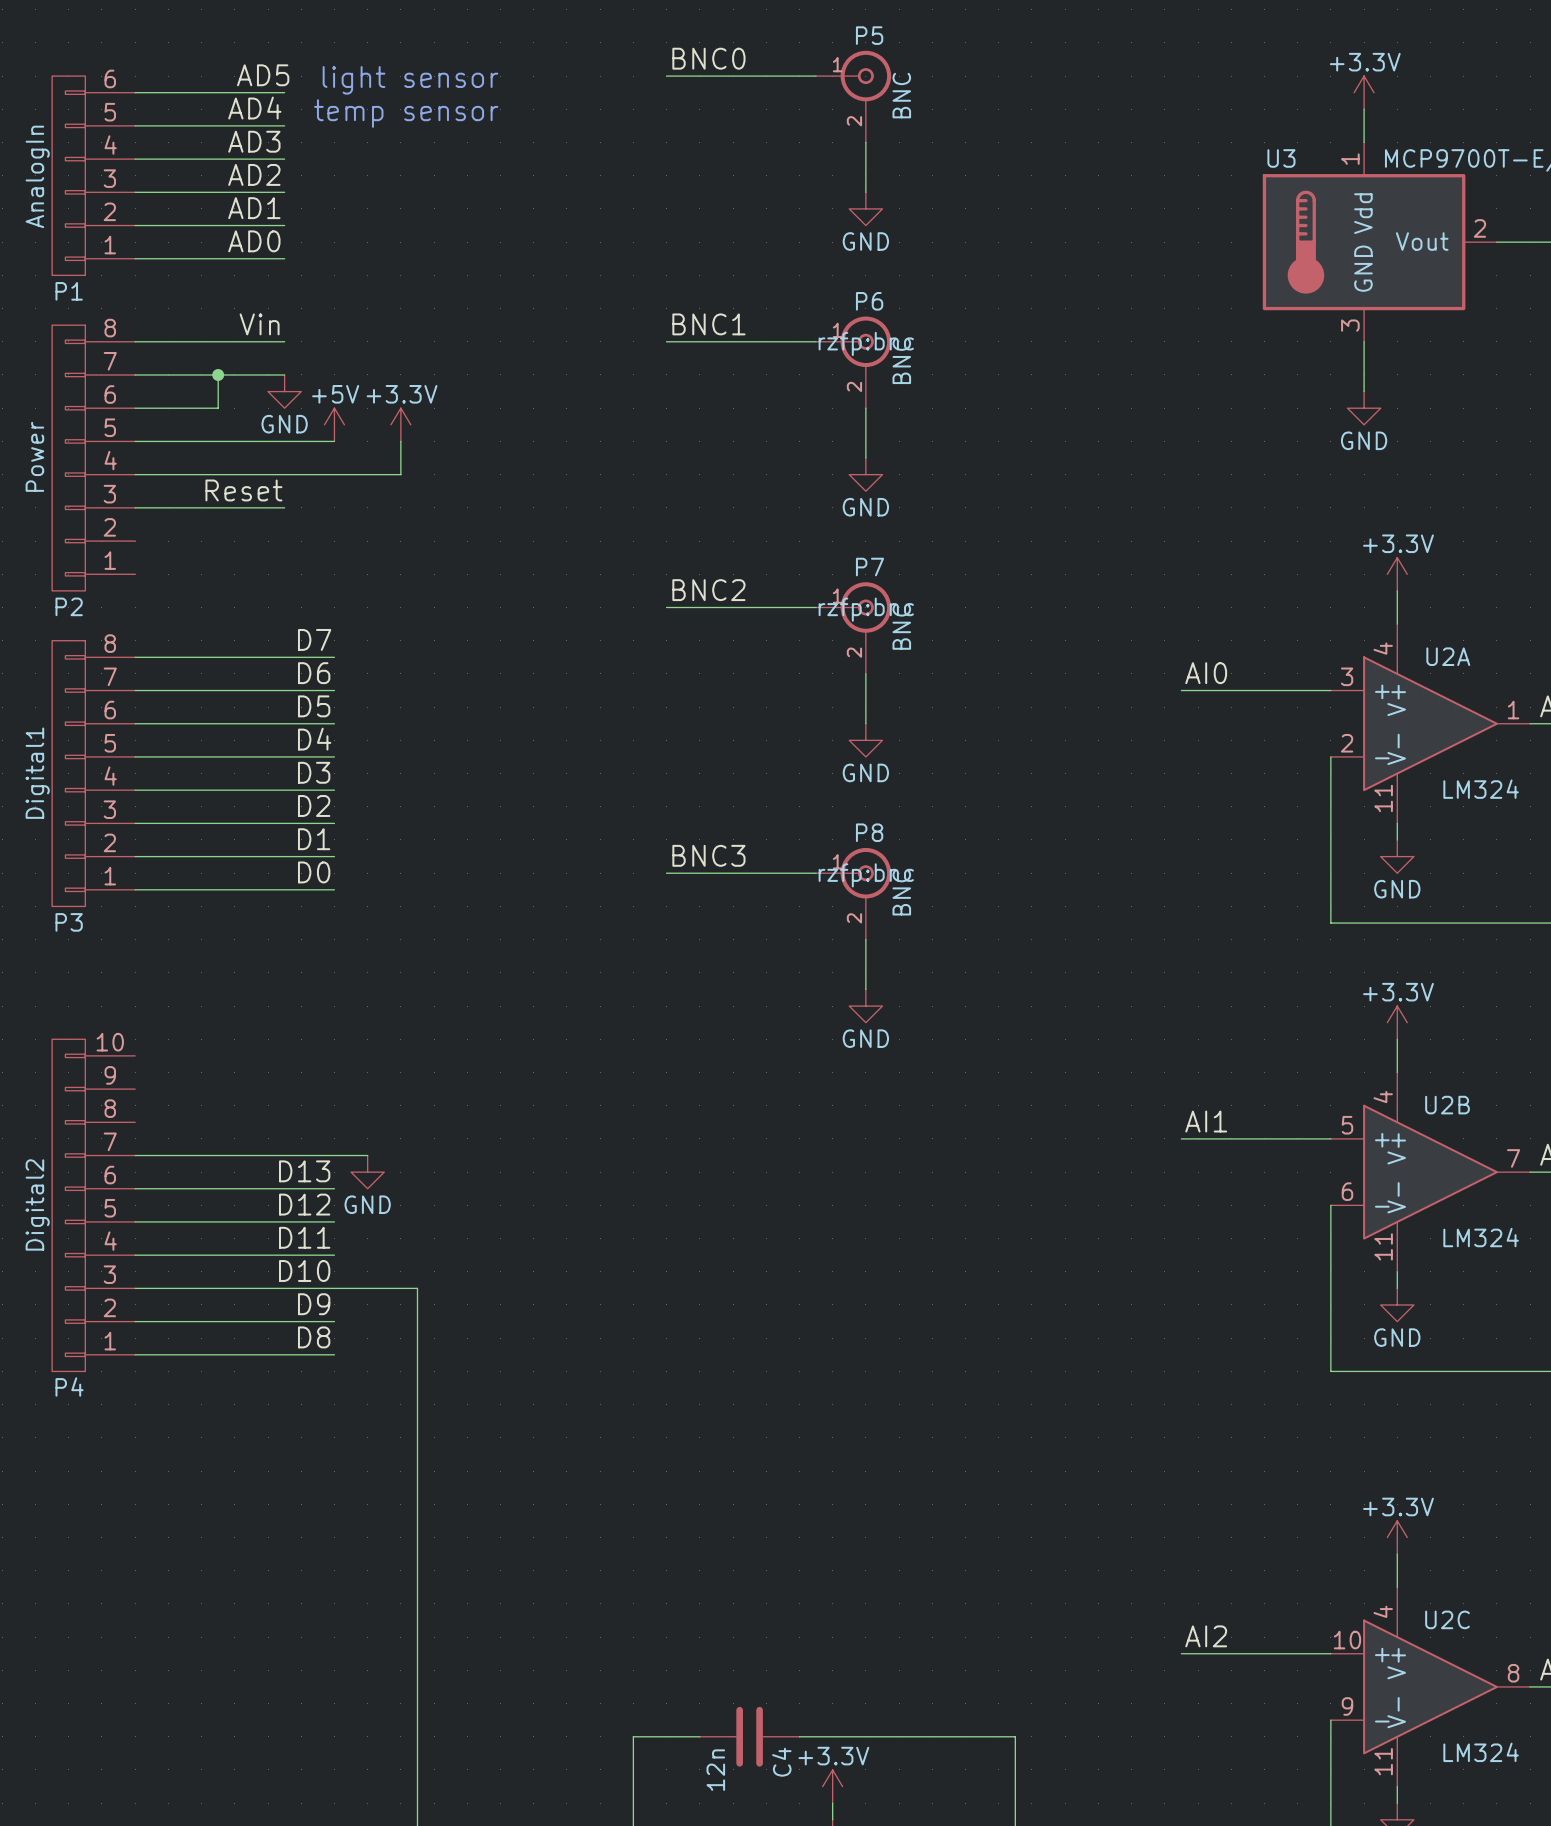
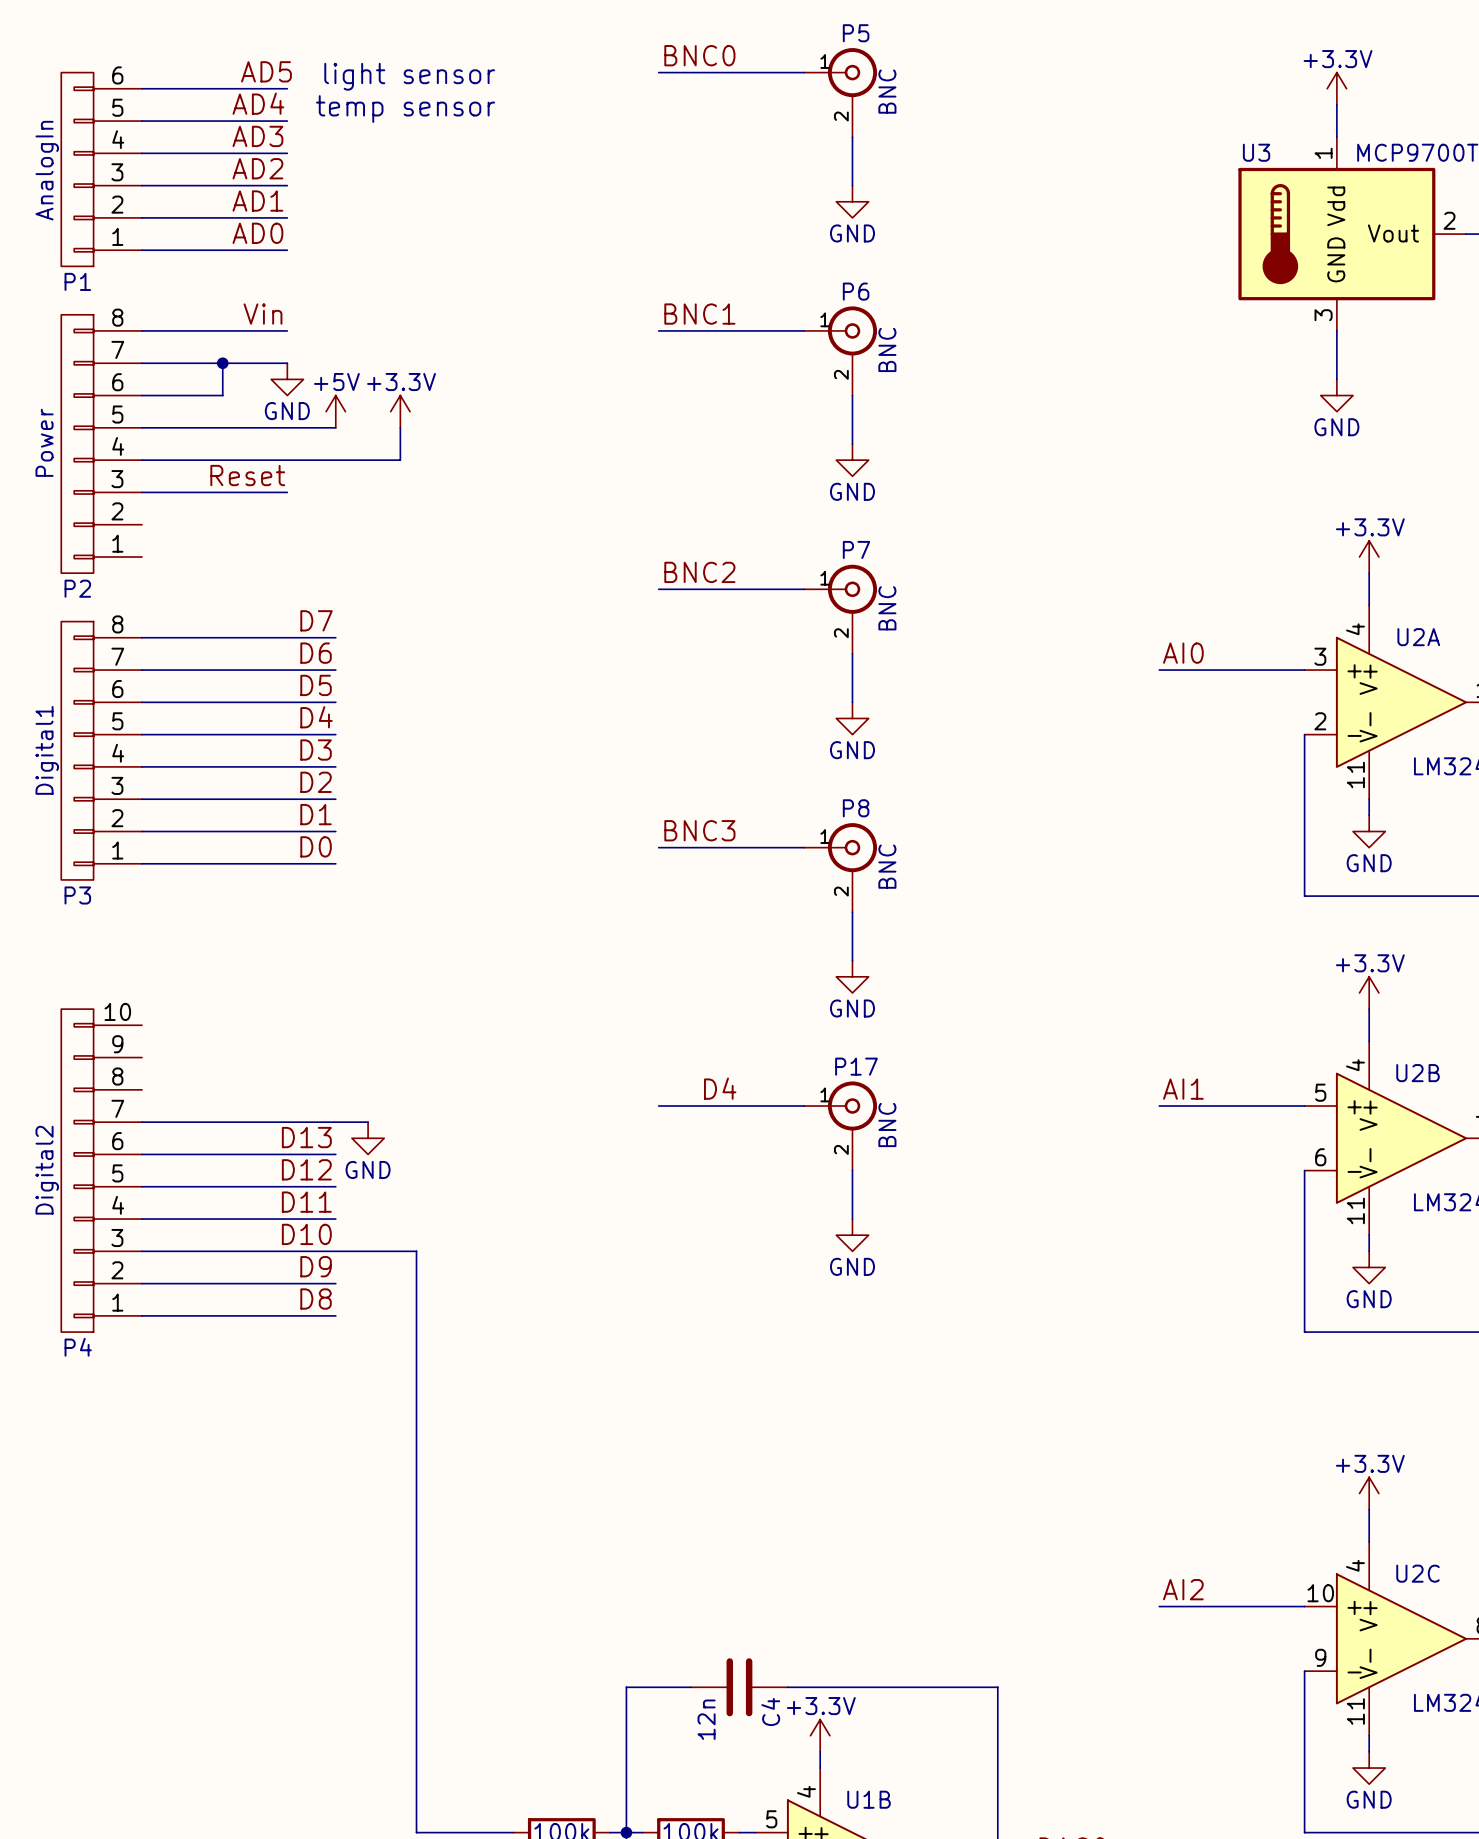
P6 text: rzfp:bnc (866, 343) -> none
P7 text: rzfp:bnc (866, 609) -> none
P8 text: rzfp:bnc (866, 875) -> none
label: none -> D4 (720, 1088)
wire: none -> (658, 1106) (804, 1106)
P17: none -> BNC (840, 1126)
wire: none -> (852, 1170) (852, 1219)
power symbol: none -> GND (852, 1235)

